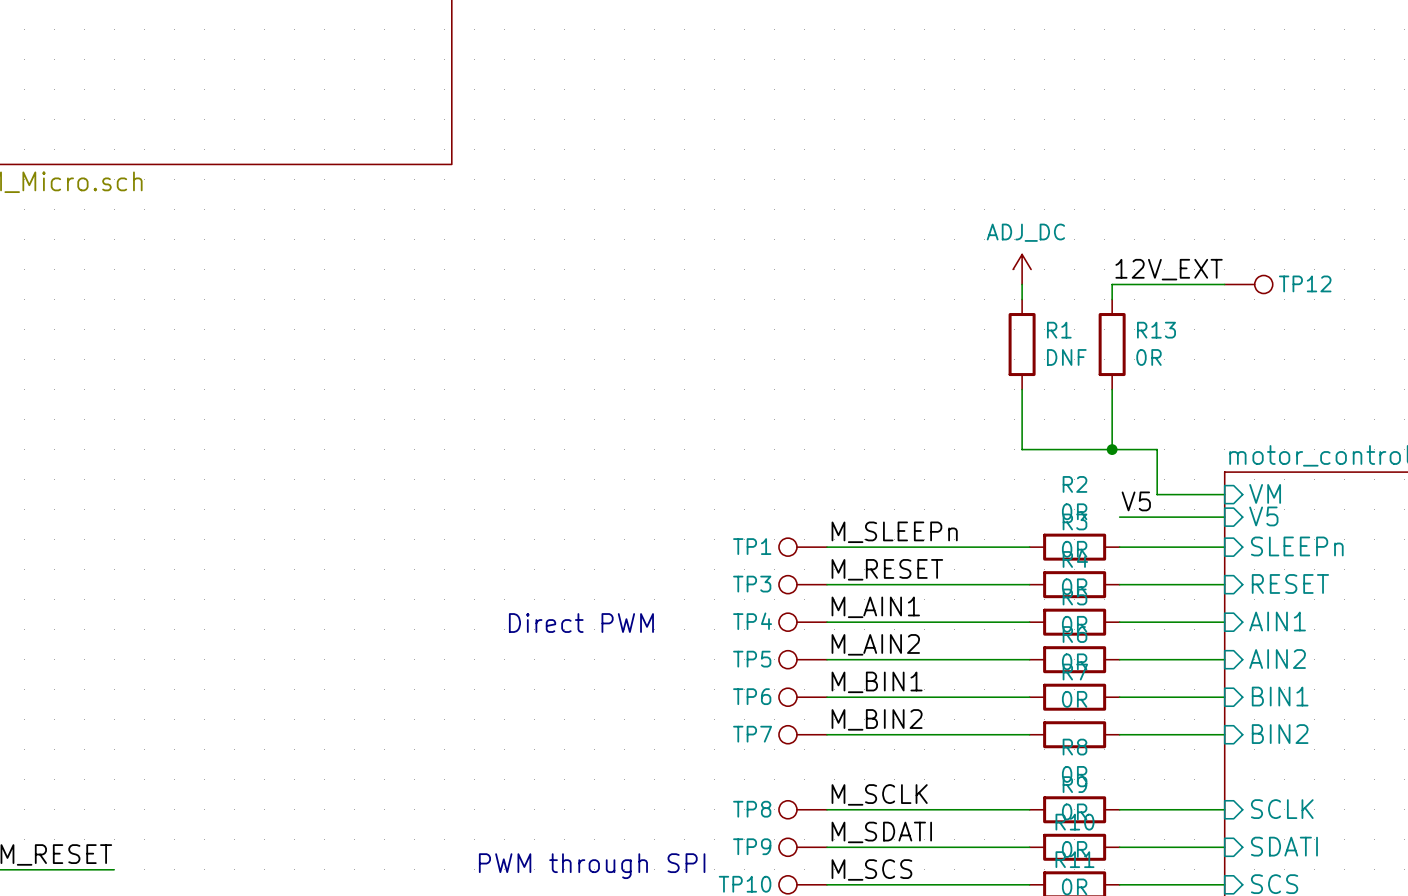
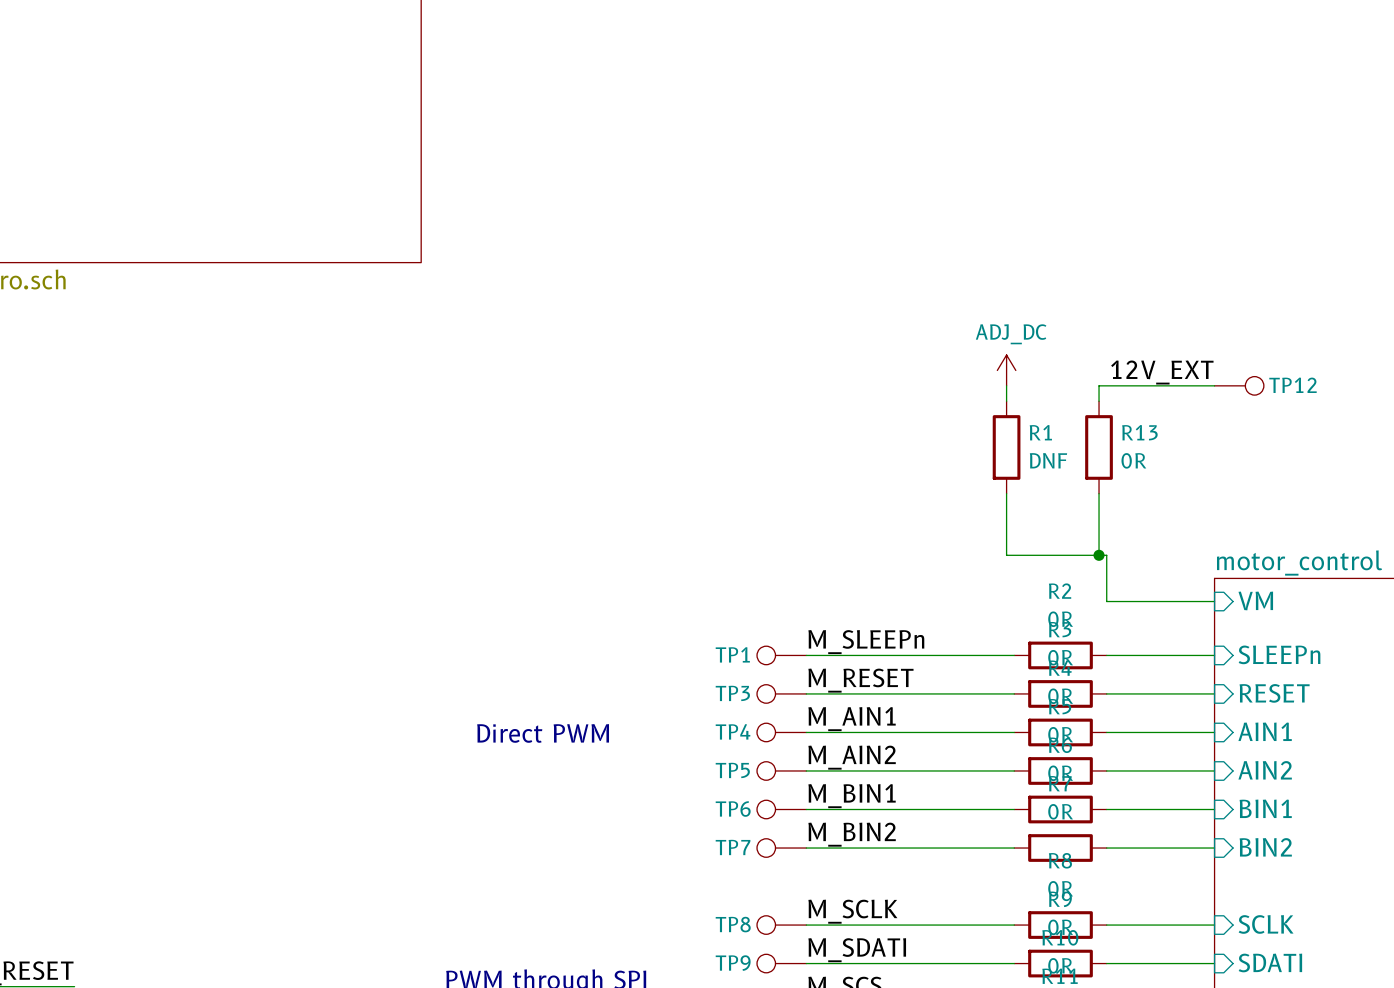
wire: (1119, 449) (1157, 449) (1157, 494) -> (1106, 555) (1106, 601) (1145, 601)
label: V5 (1136, 501) -> none
sheet pin: V5 (1263, 516) -> none
wire: (1119, 517) (1224, 517) -> none

